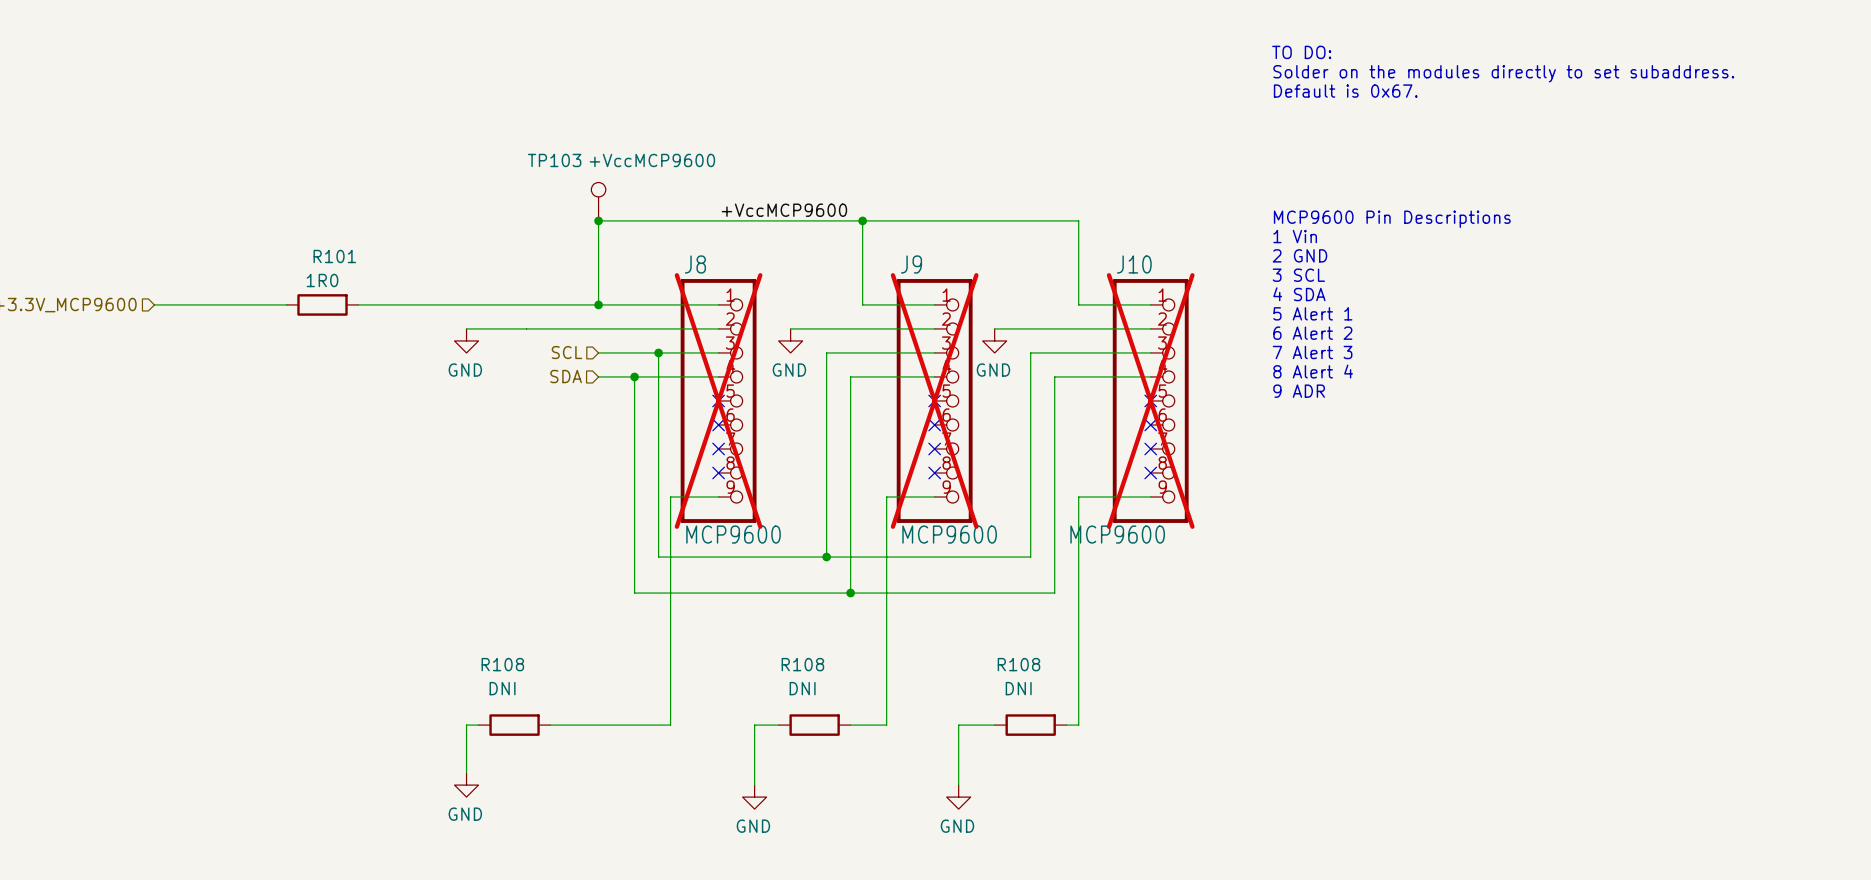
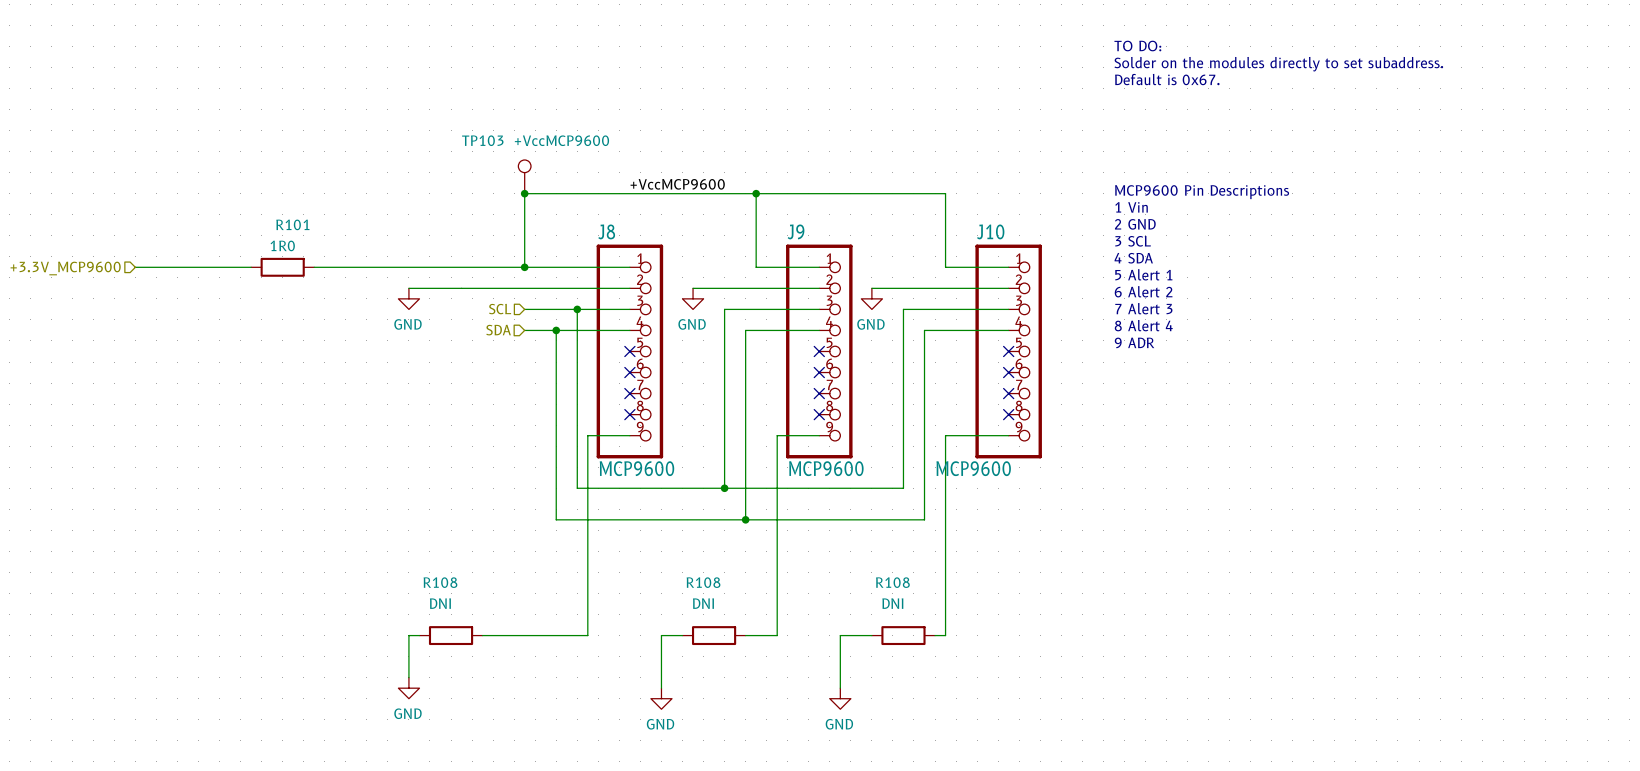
J8 do-not-place cross: (718, 400) -> none
J9 do-not-place cross: (934, 400) -> none
J10 do-not-place cross: (1150, 400) -> none

